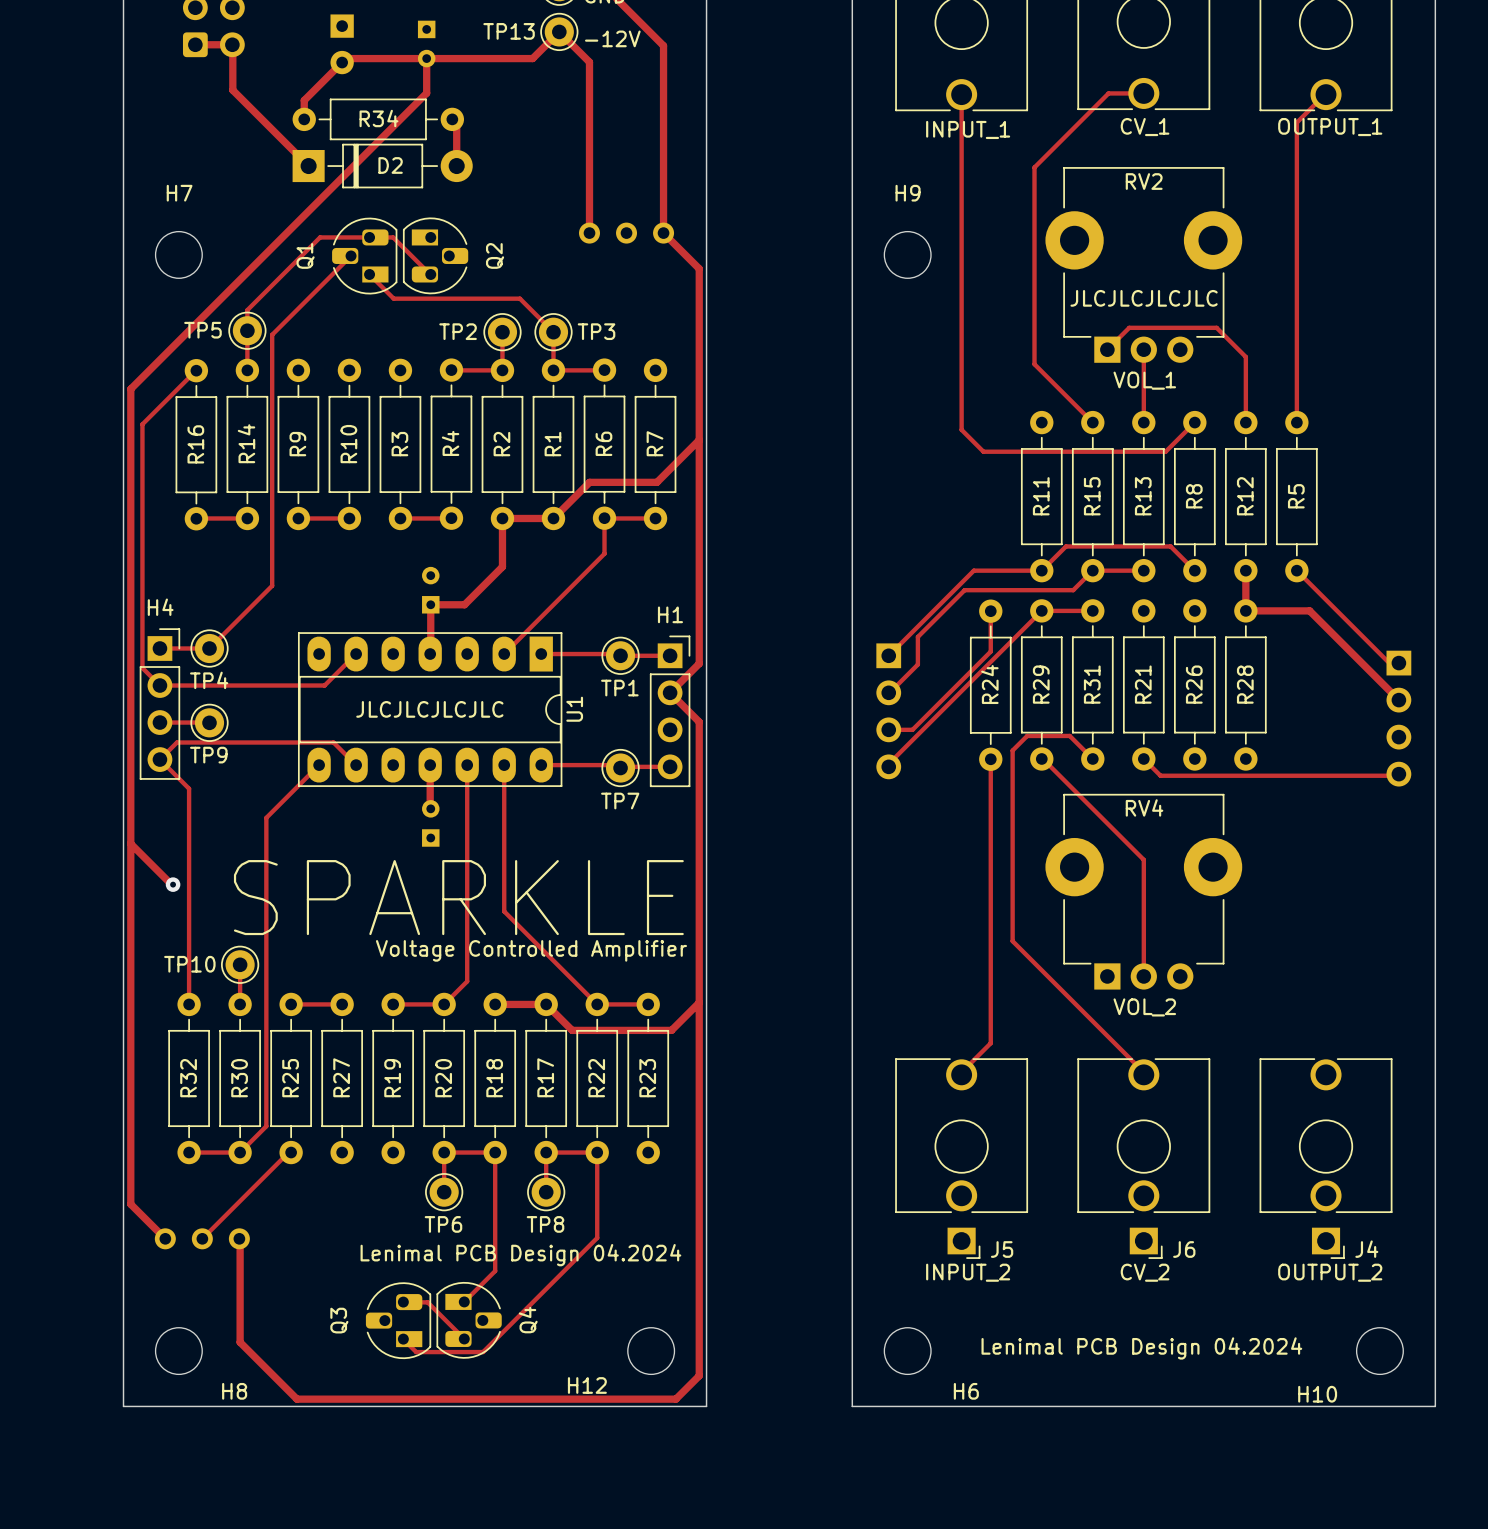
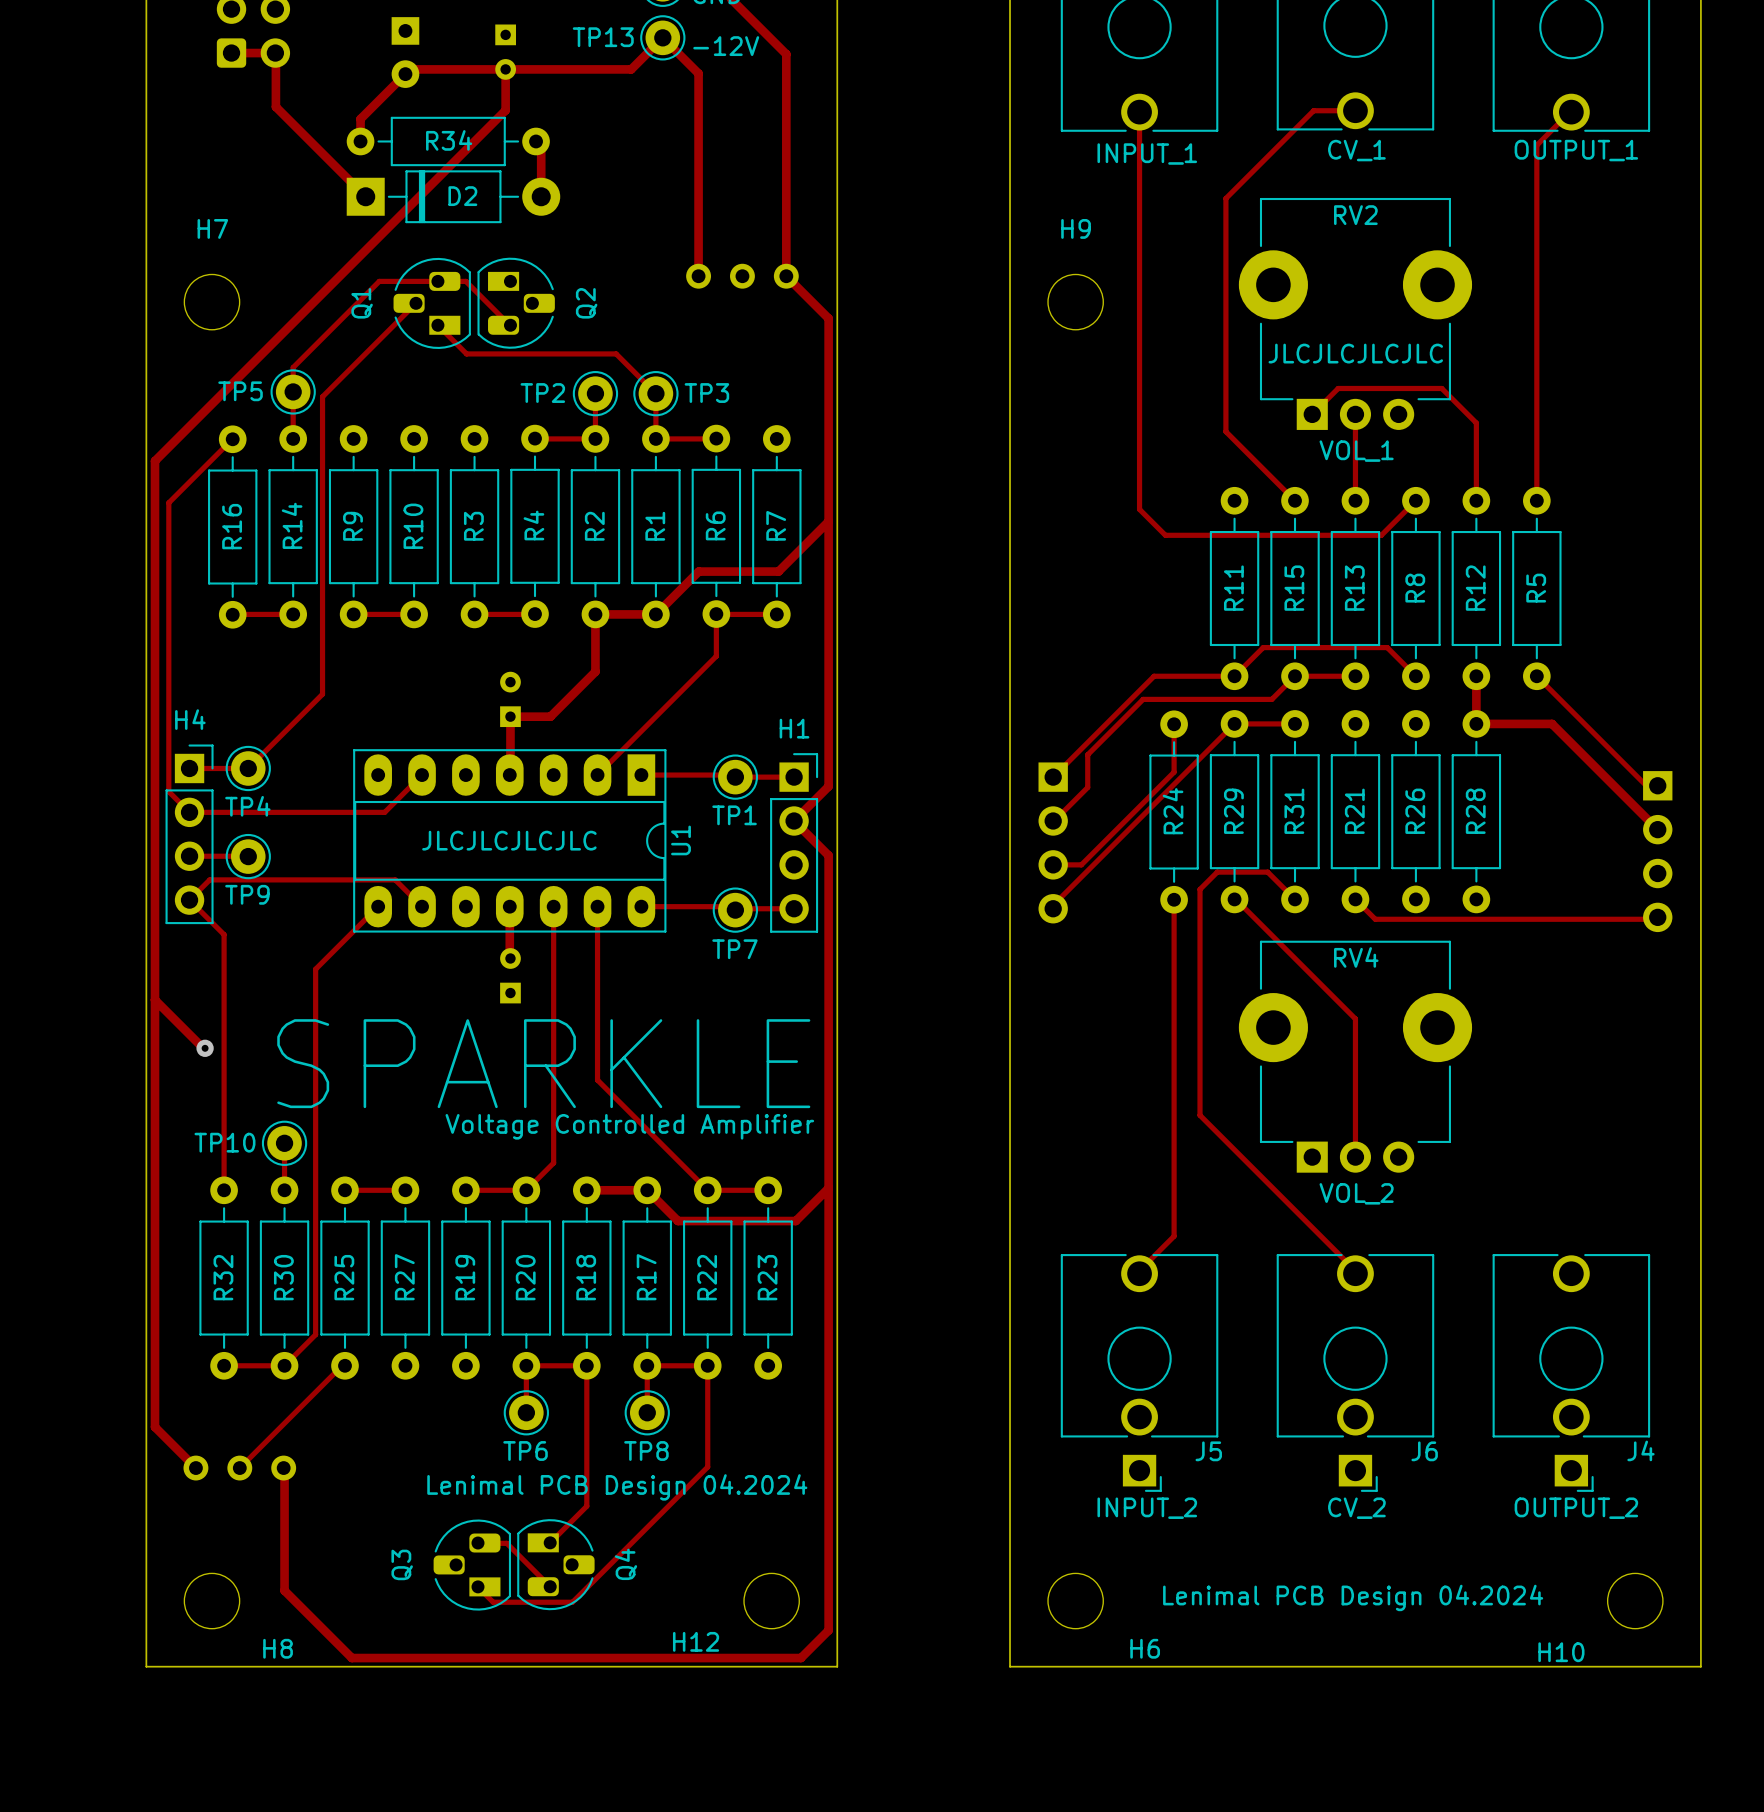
J5 name position: J5 (1002, 1249) -> J5 (1208, 1451)
J6 name position: J6 (1184, 1249) -> J6 (1424, 1451)
J4 name position: J4 (1366, 1249) -> J4 (1640, 1450)

